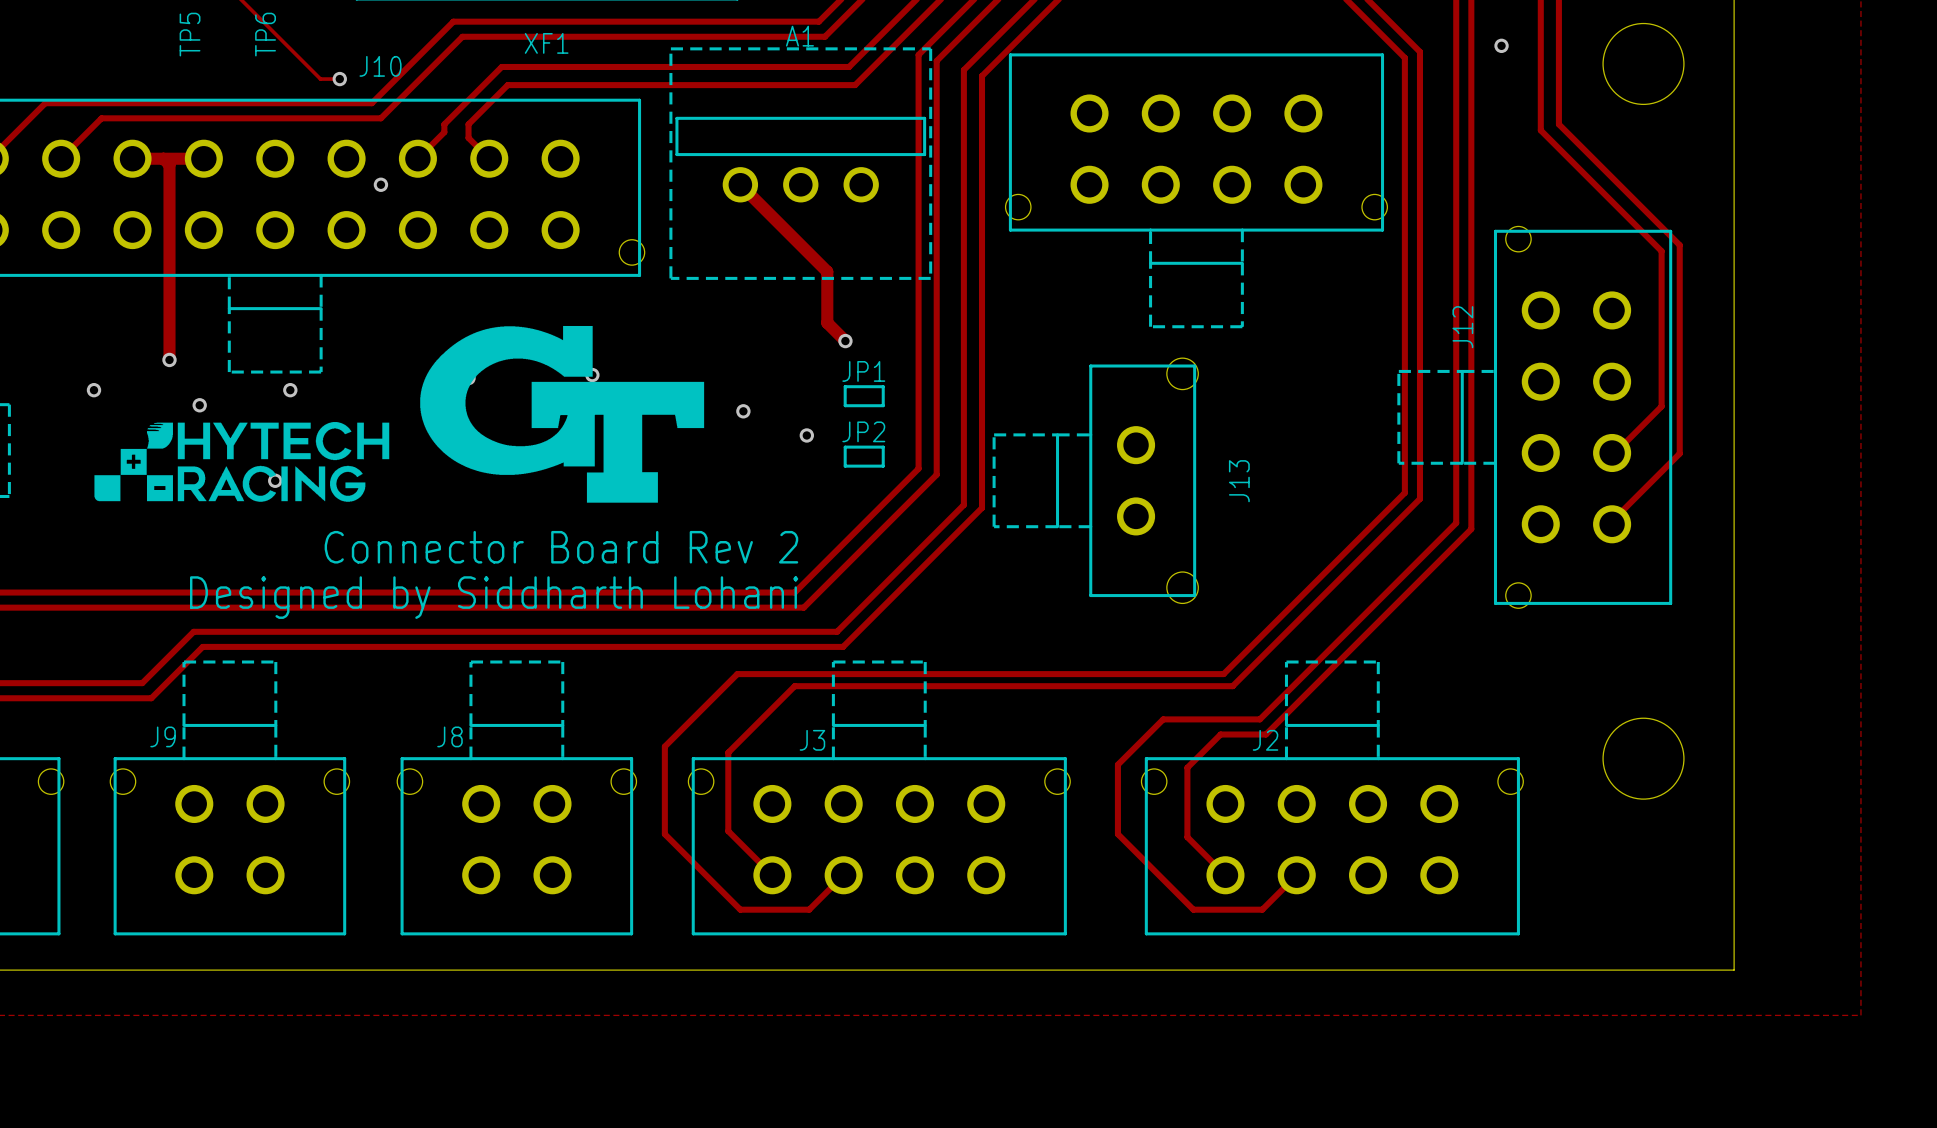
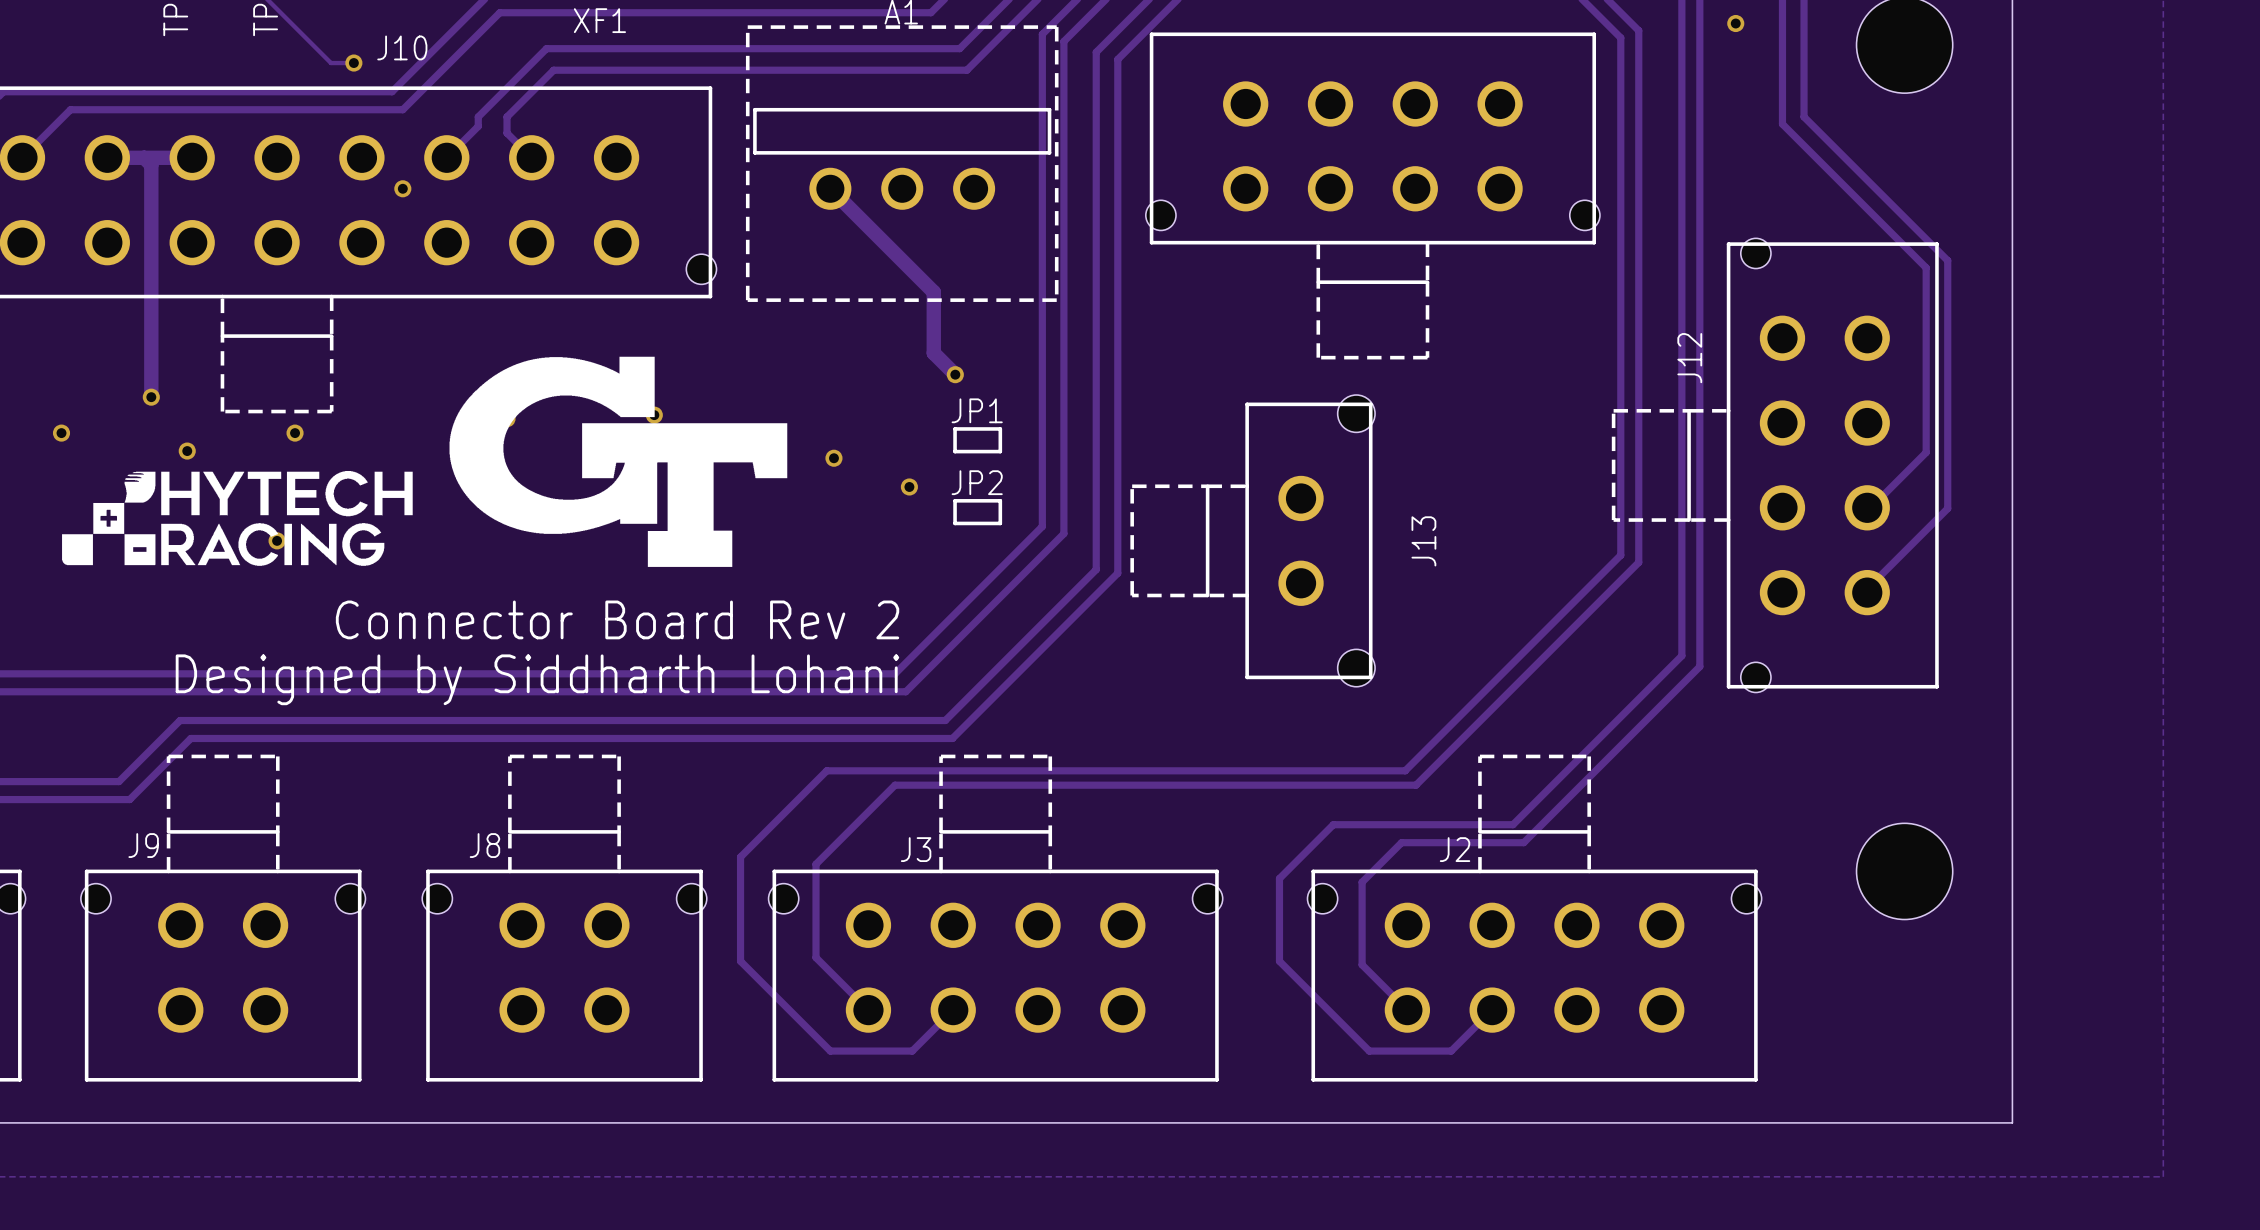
track: (1456, 523) (1259, 719) -> (1681, 591) (1681, 655) (1513, 824) (1448, 824)
track: (1471, 529) (1265, 734) -> (1699, 598) (1699, 666) (1523, 842) (1455, 842)

